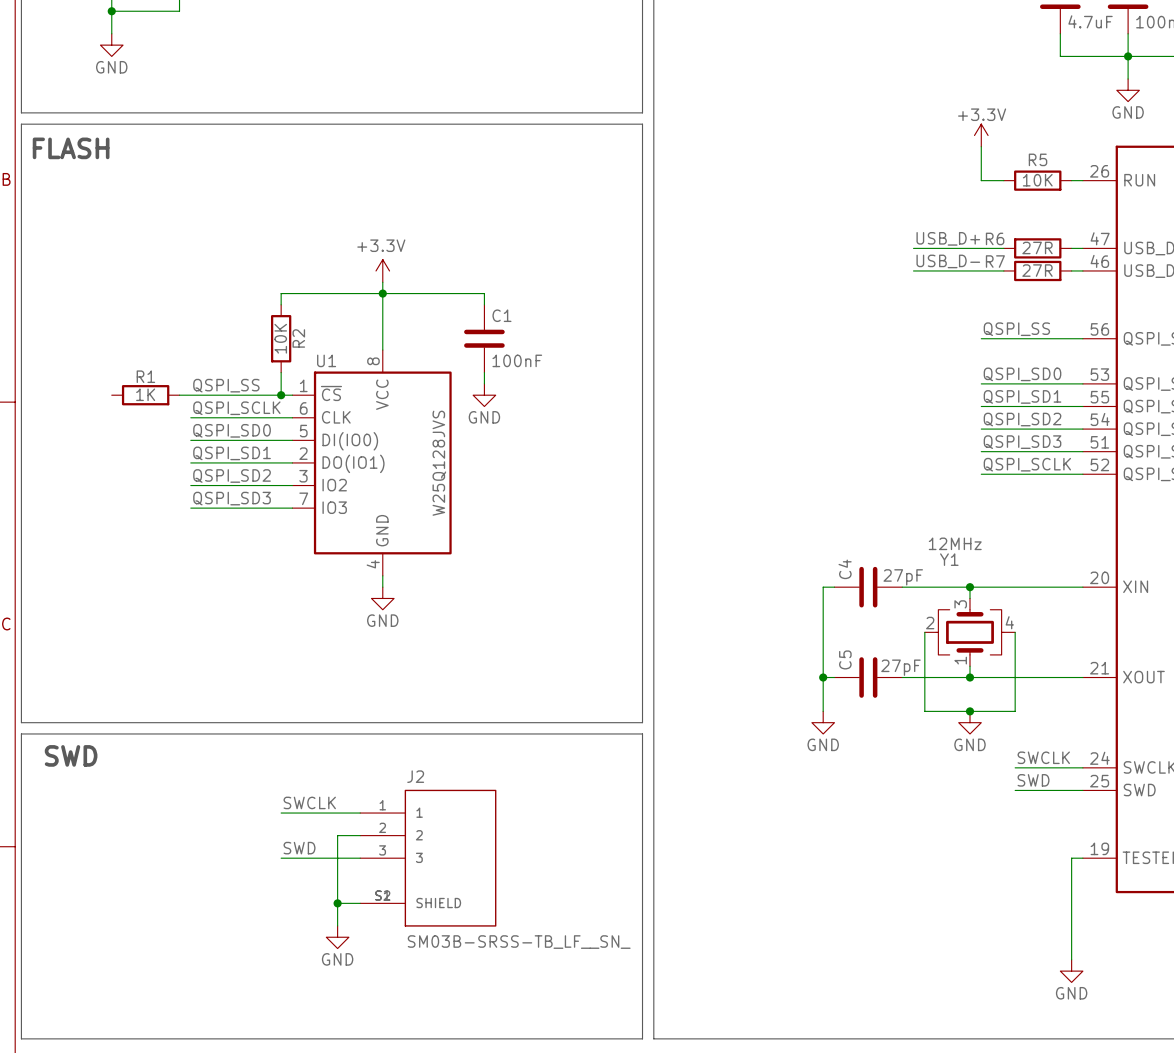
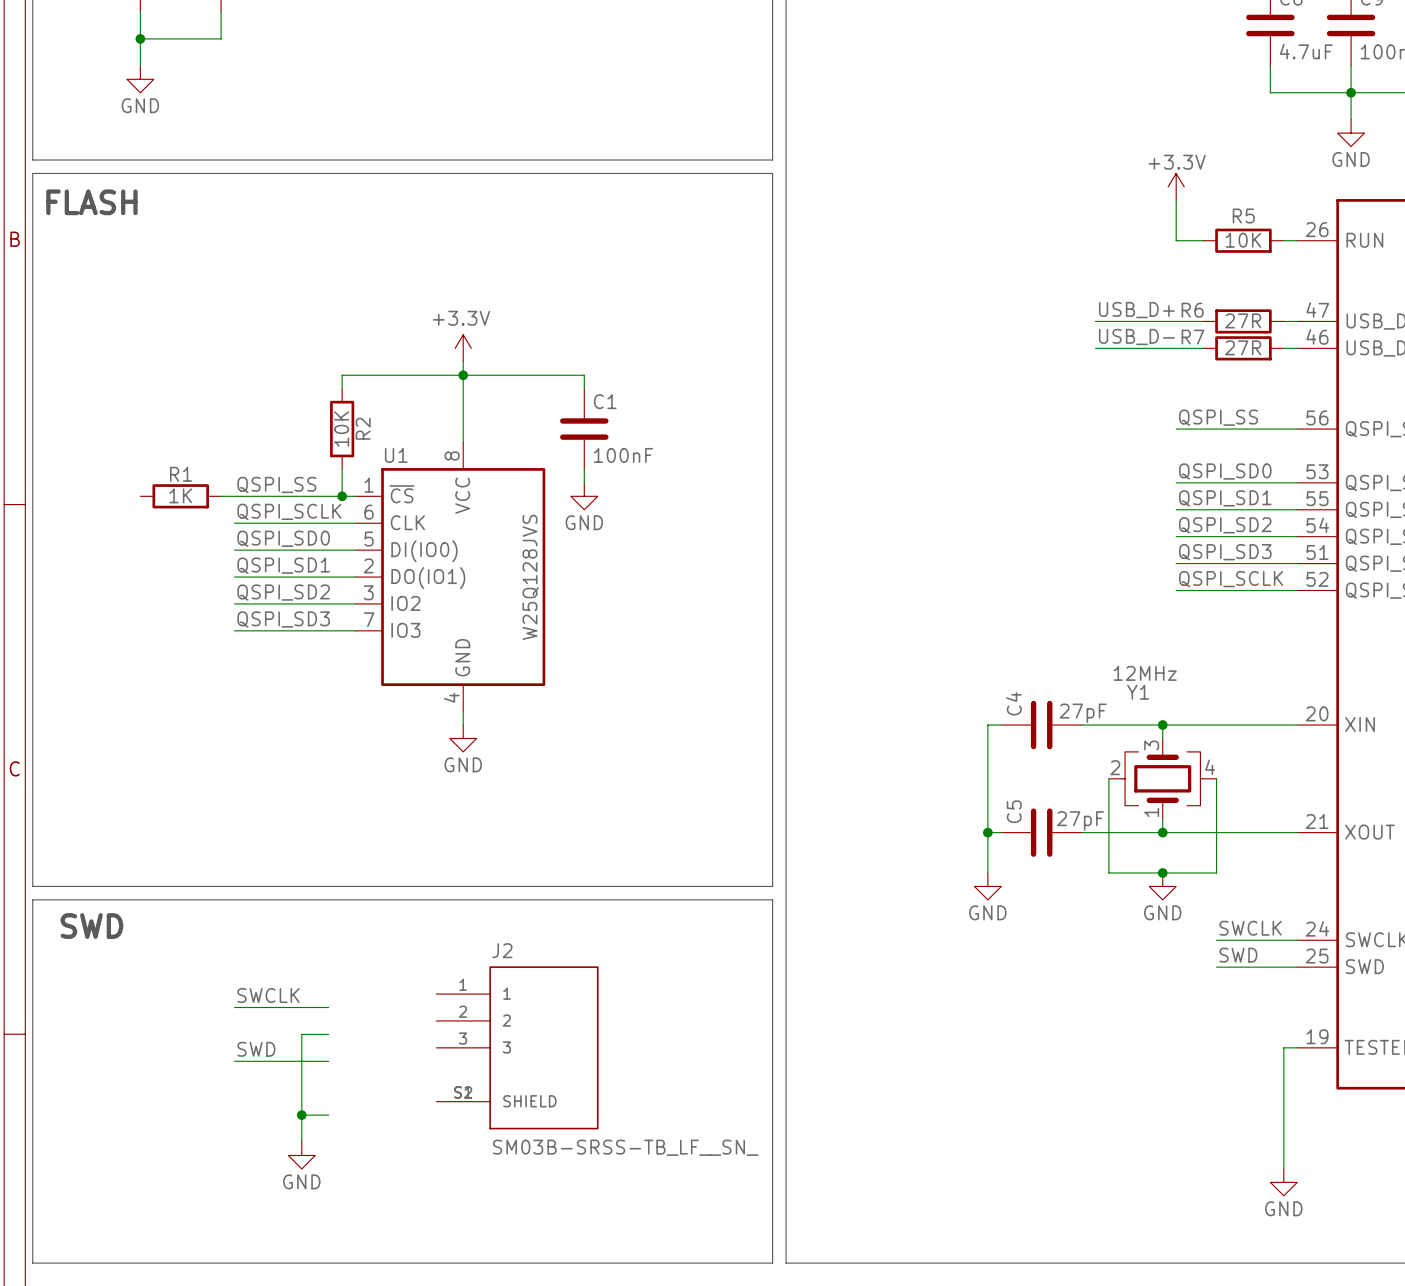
label position: SWCLK (309, 802) -> SWCLK (268, 995)
wire: (281, 813) (360, 813) -> (234, 1007) (328, 1007)
wire: (360, 835) (337, 835) (337, 925) -> (328, 1034) (301, 1034) (301, 1142)
label position: SWD (299, 848) -> SWD (256, 1049)
wire: (281, 858) (360, 858) -> (234, 1061) (328, 1061)
wire: (337, 903) (360, 903) -> (301, 1115) (328, 1115)
junction: (337, 903) -> none
junction: none -> (301, 1115)
power symbol position: GND (337, 937) -> GND (301, 1155)

